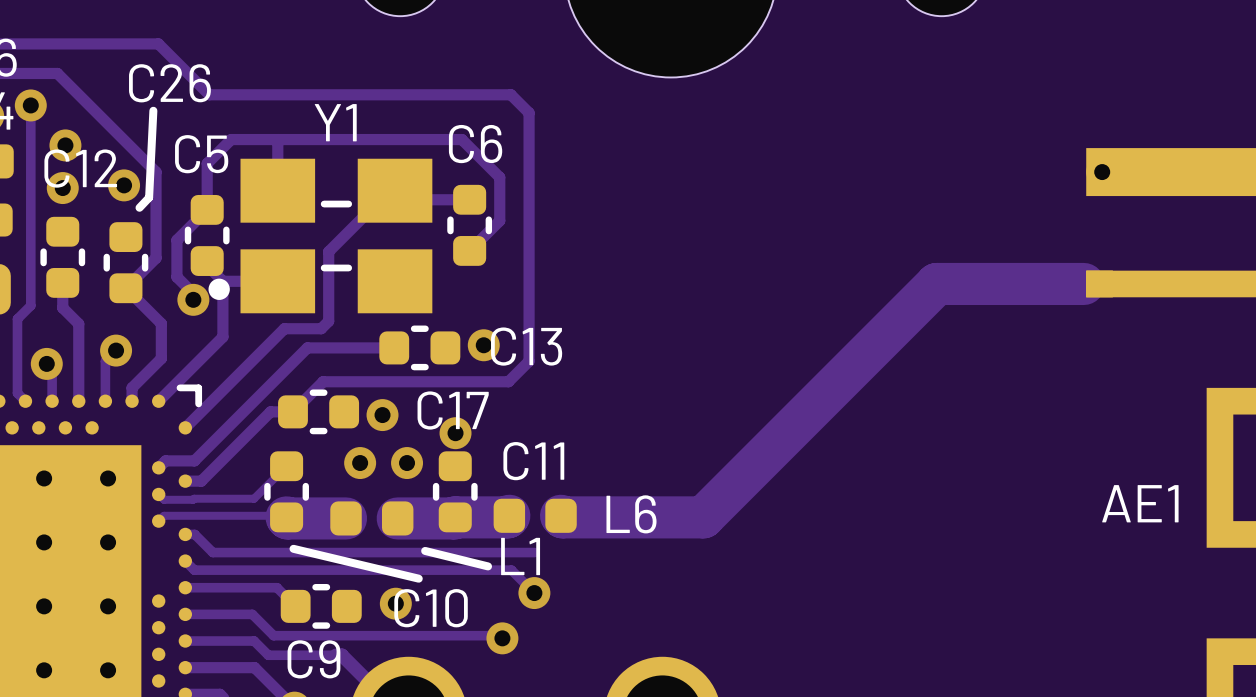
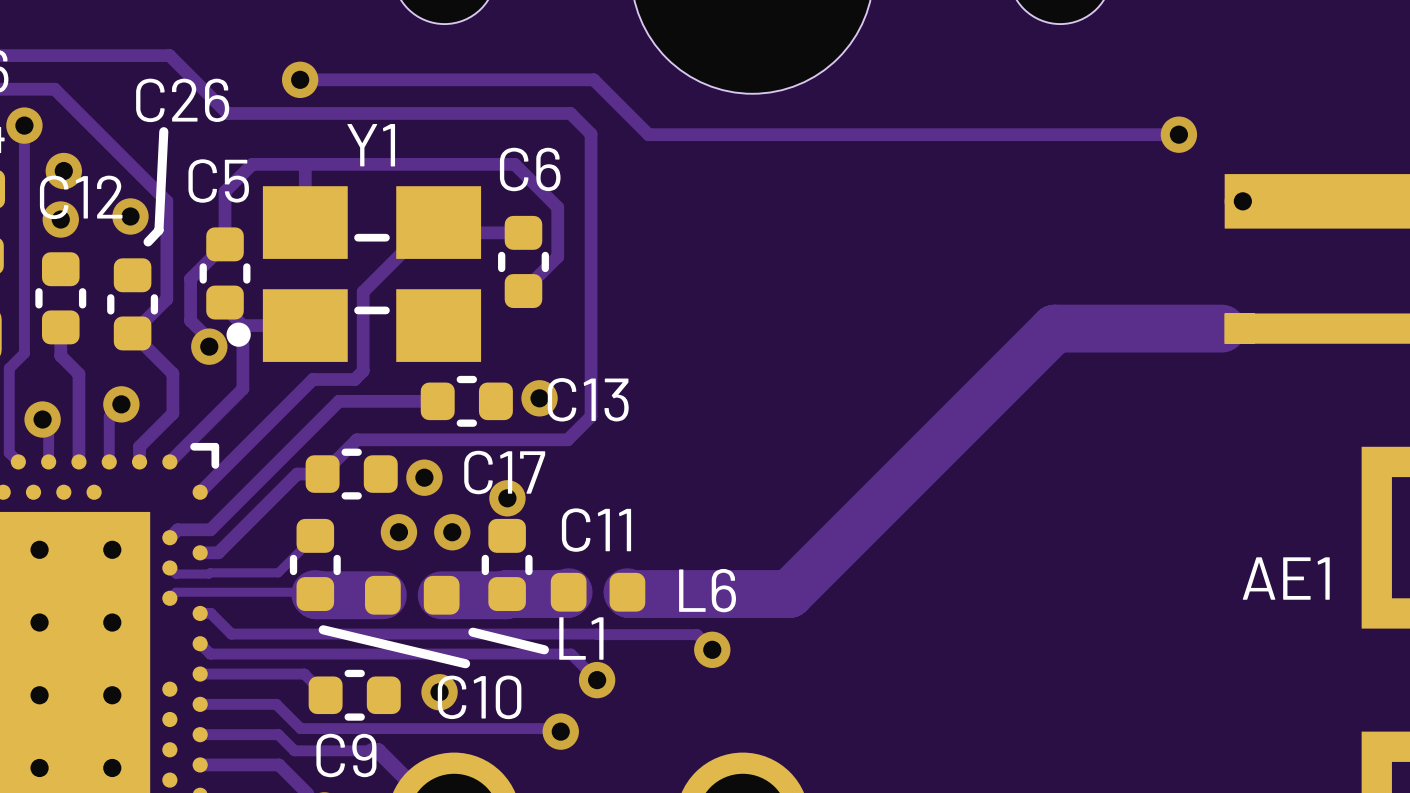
track: none -> (300, 79) (593, 79) (648, 134) (1178, 134)
via: none -> (300, 79)
via: none -> (1178, 134)
track: none -> (597, 634) (697, 634) (712, 649)
via: none -> (712, 649)

